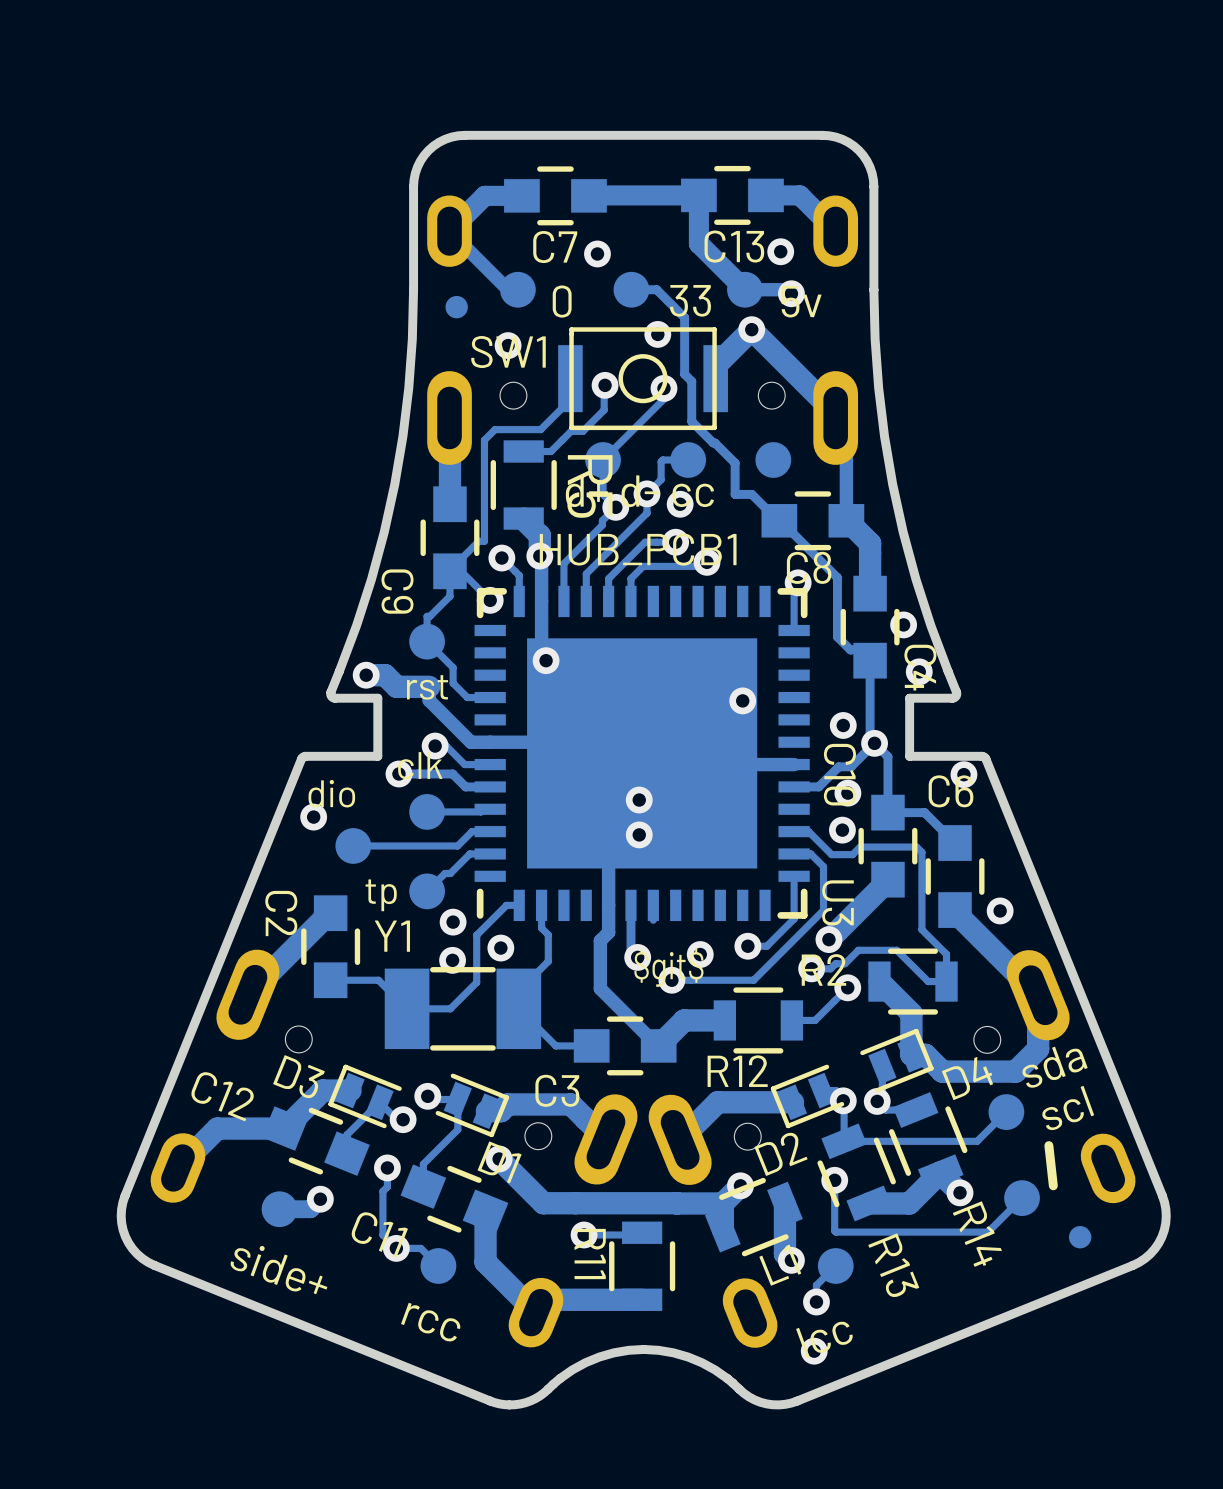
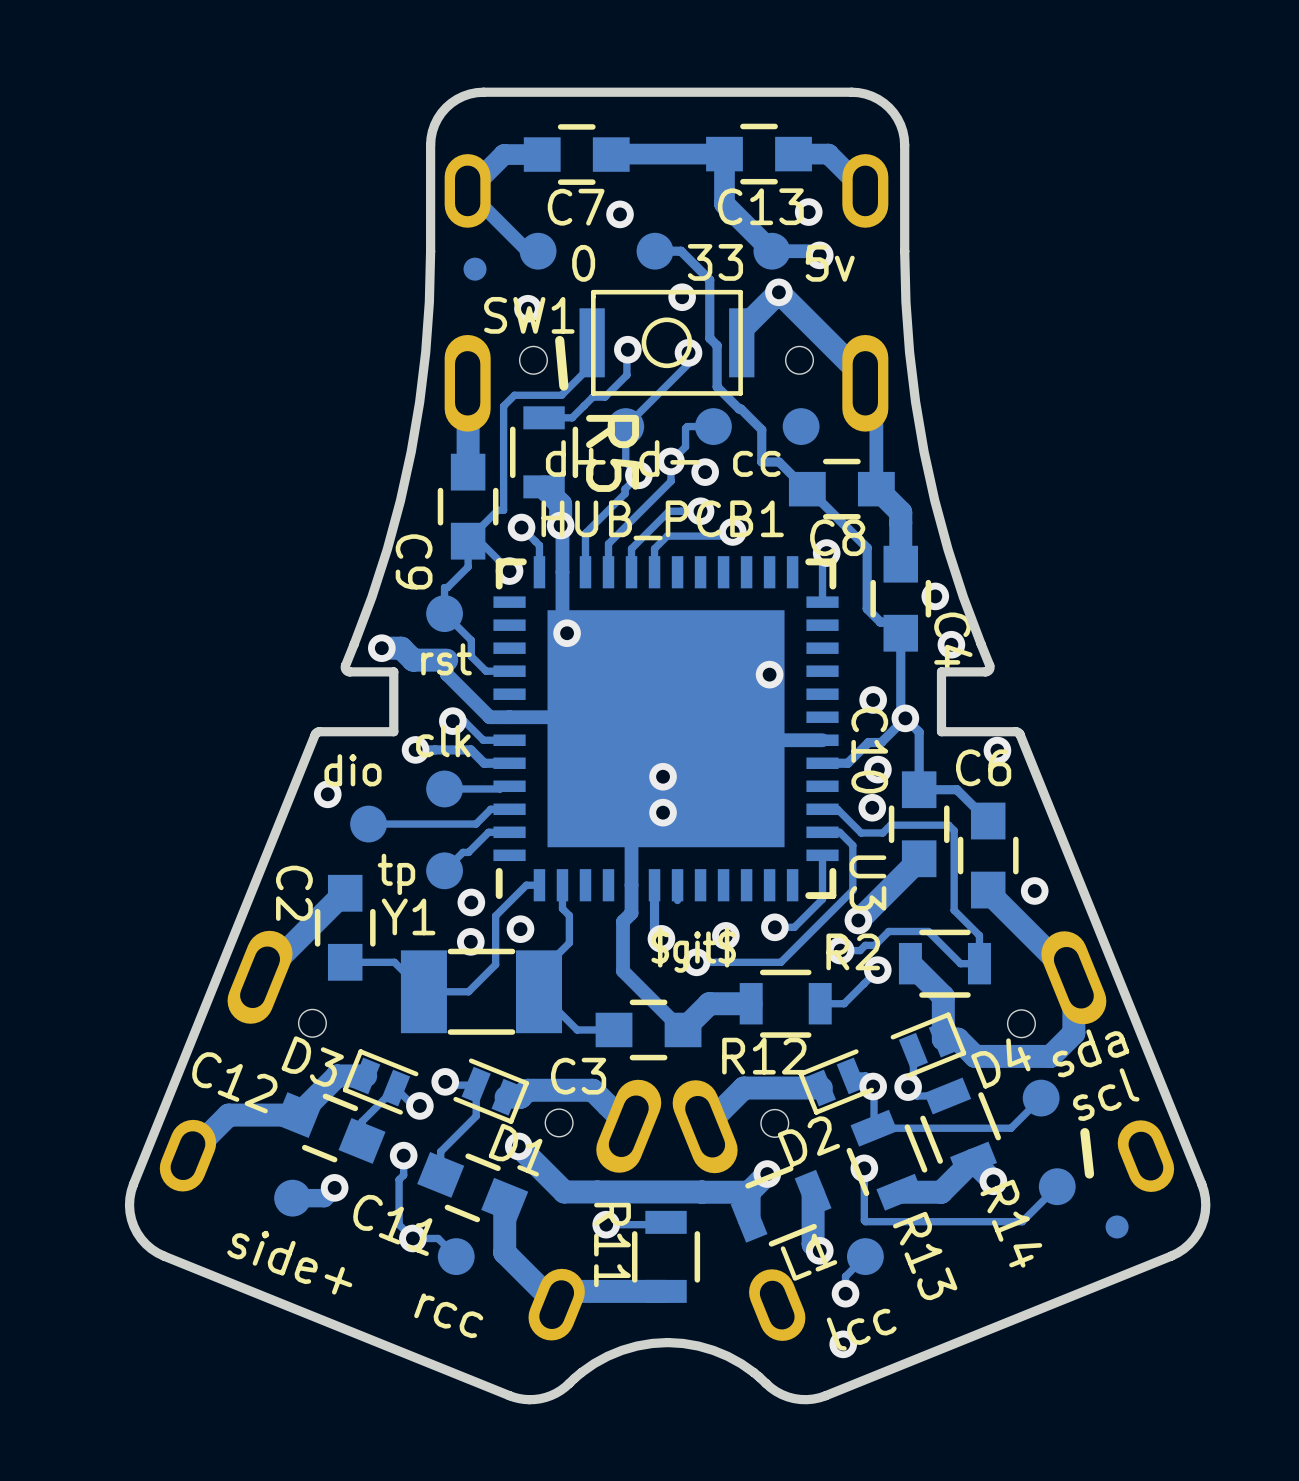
line: none -> (559, 340) (563, 386)

